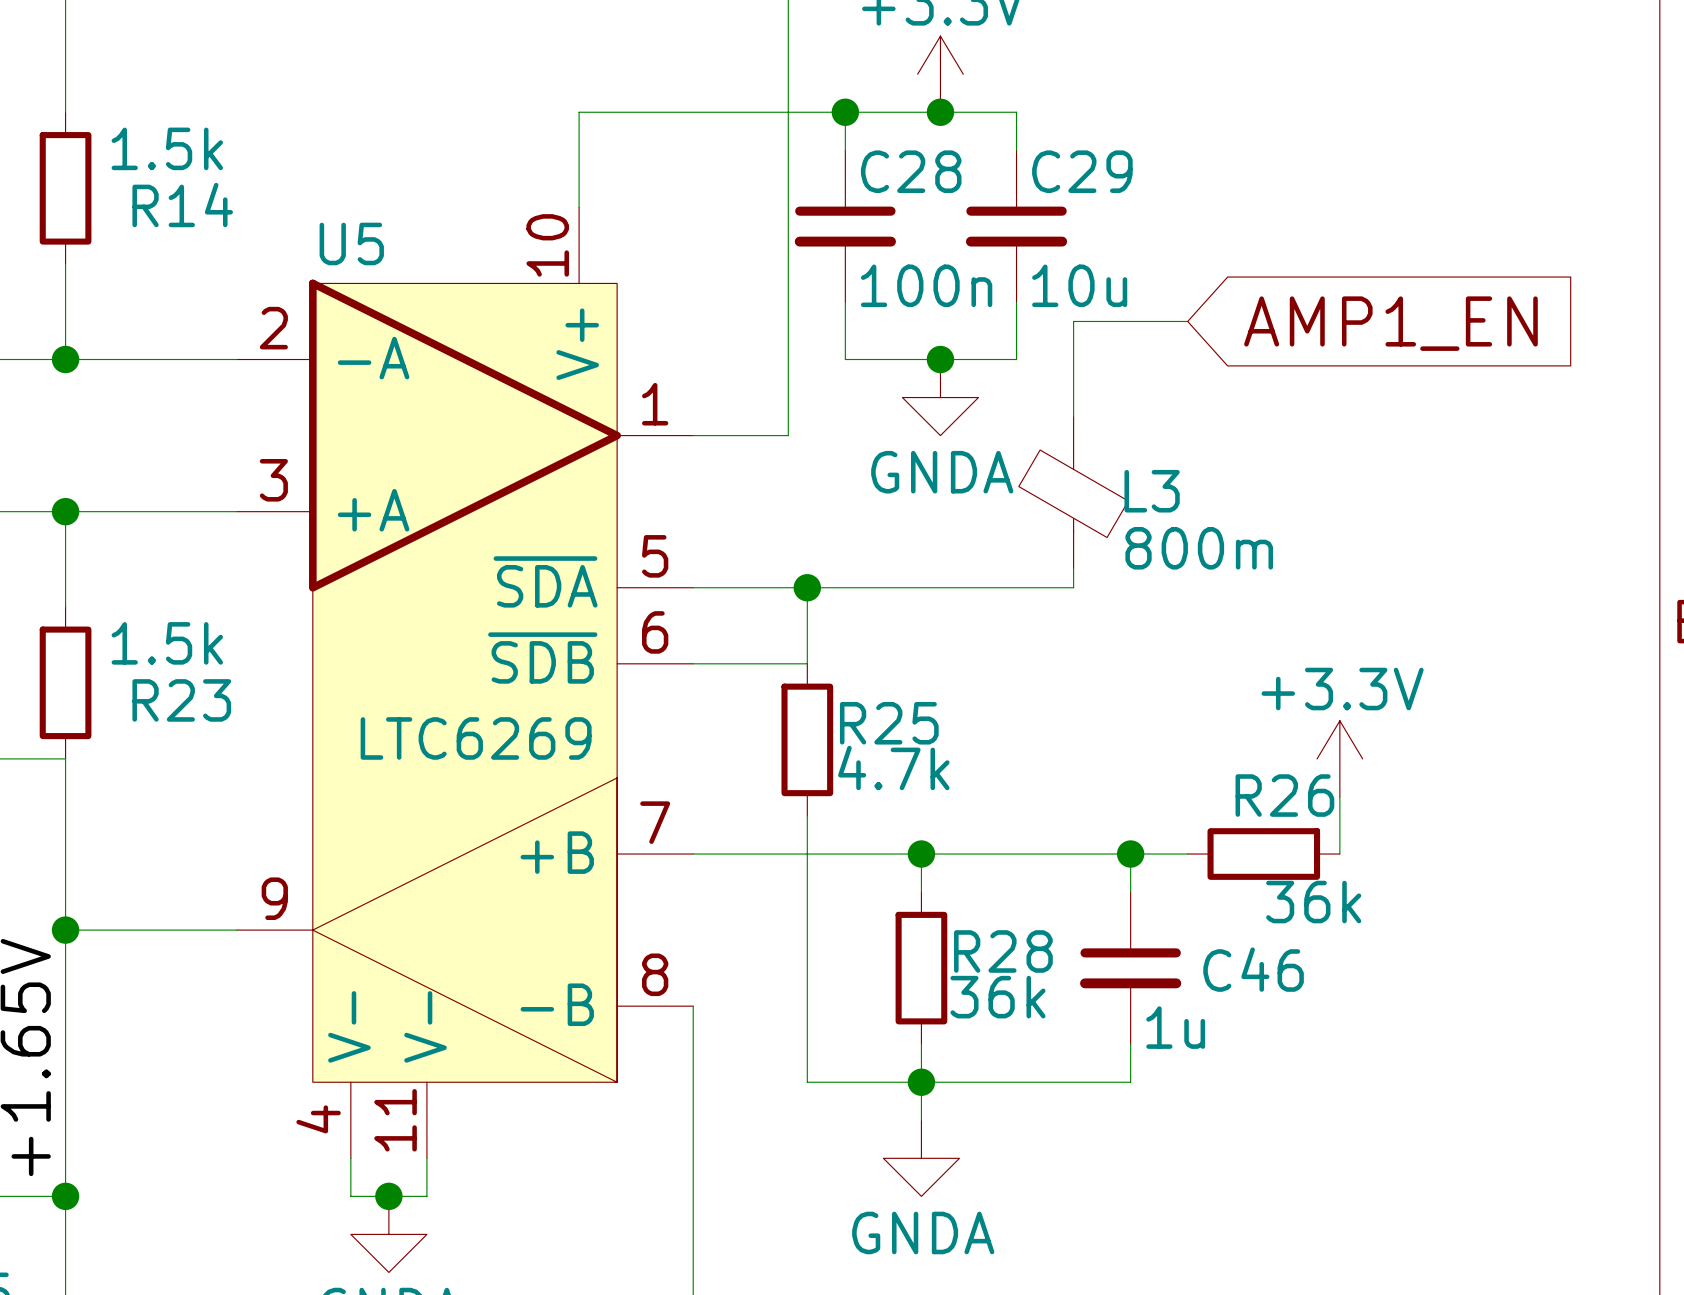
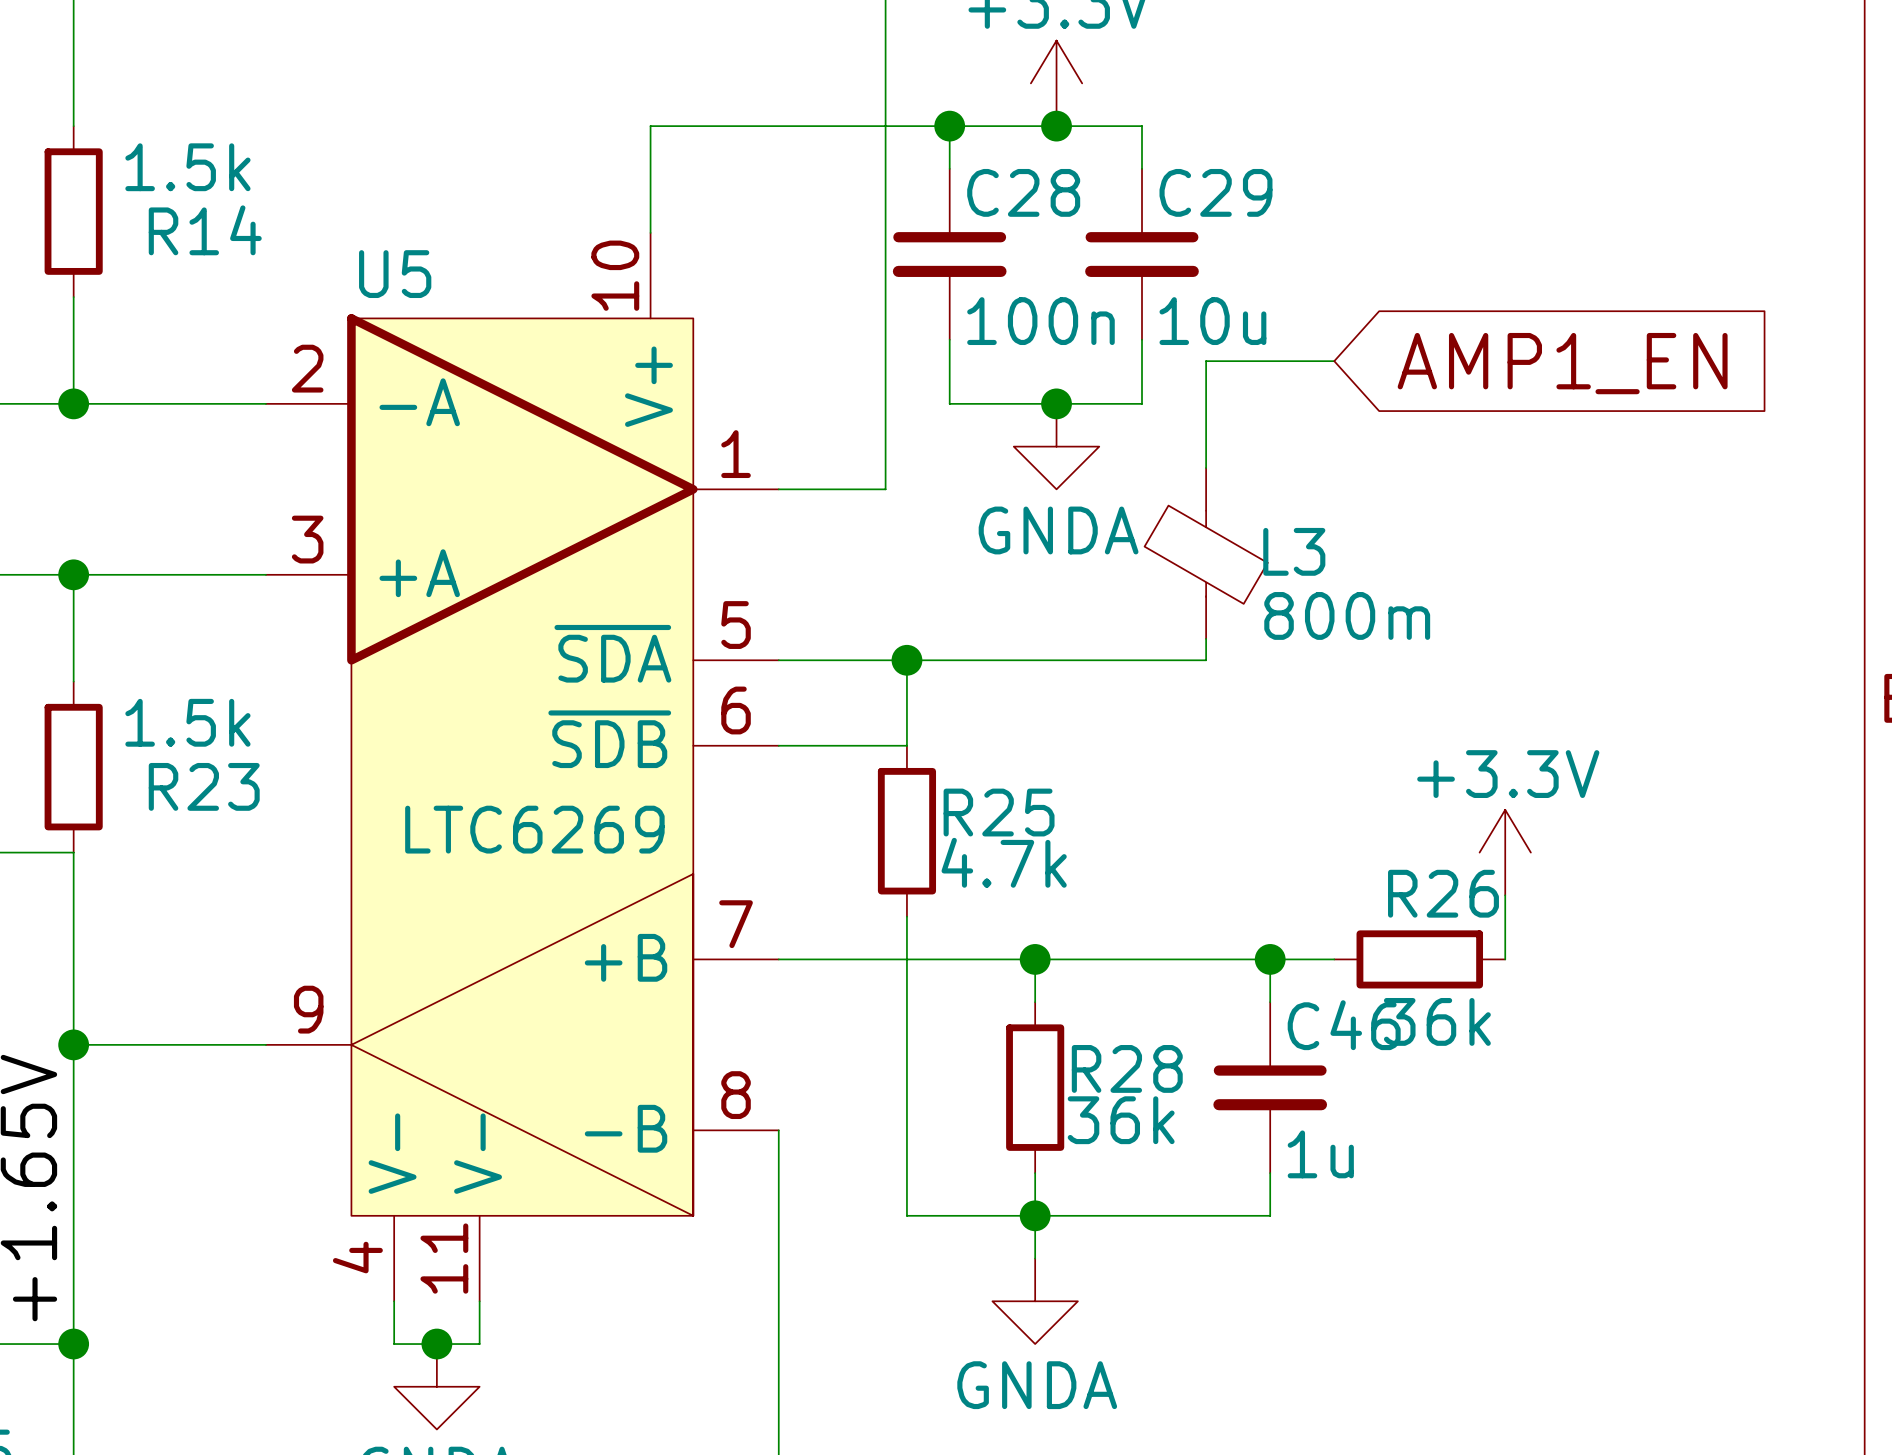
R26 value position: 36k (1313, 902) -> 36k (1437, 1021)
C46 name position: C46 (1253, 969) -> C46 (1344, 1025)

